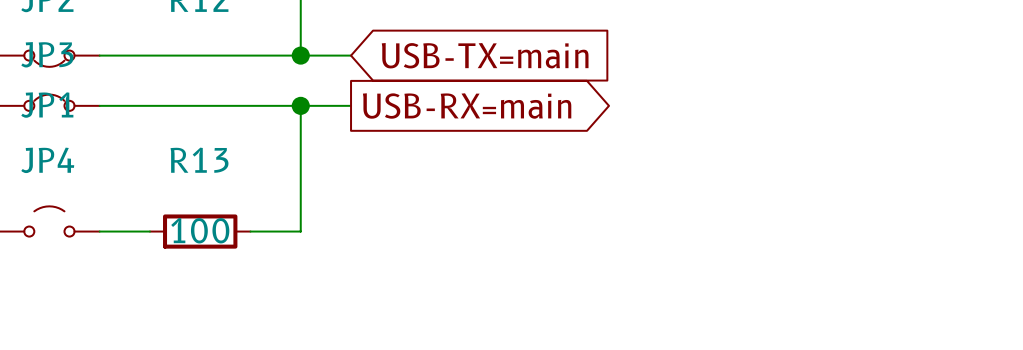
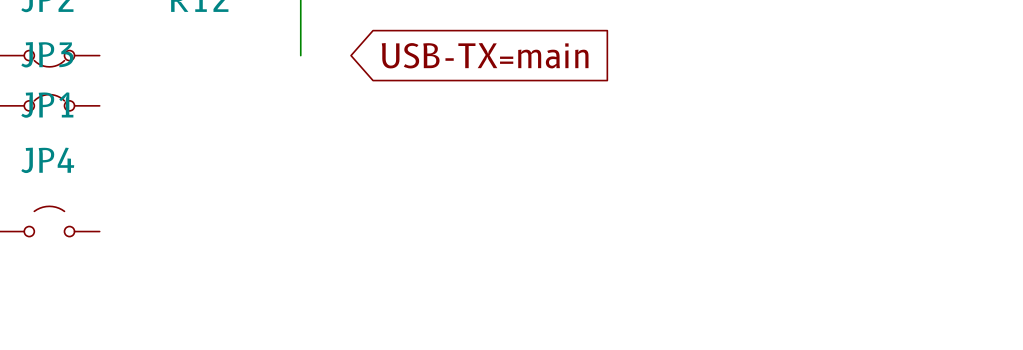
wire: (99, 55) (351, 55) -> none
junction: (300, 55) -> none
wire: (99, 105) (351, 105) -> none
wire: (300, 105) (300, 231) (250, 231) -> none
junction: (300, 105) -> none
global label: USB-RX=main (467, 106) -> none
wire: (99, 231) (149, 231) -> none
R13: 100 (200, 231) -> none

